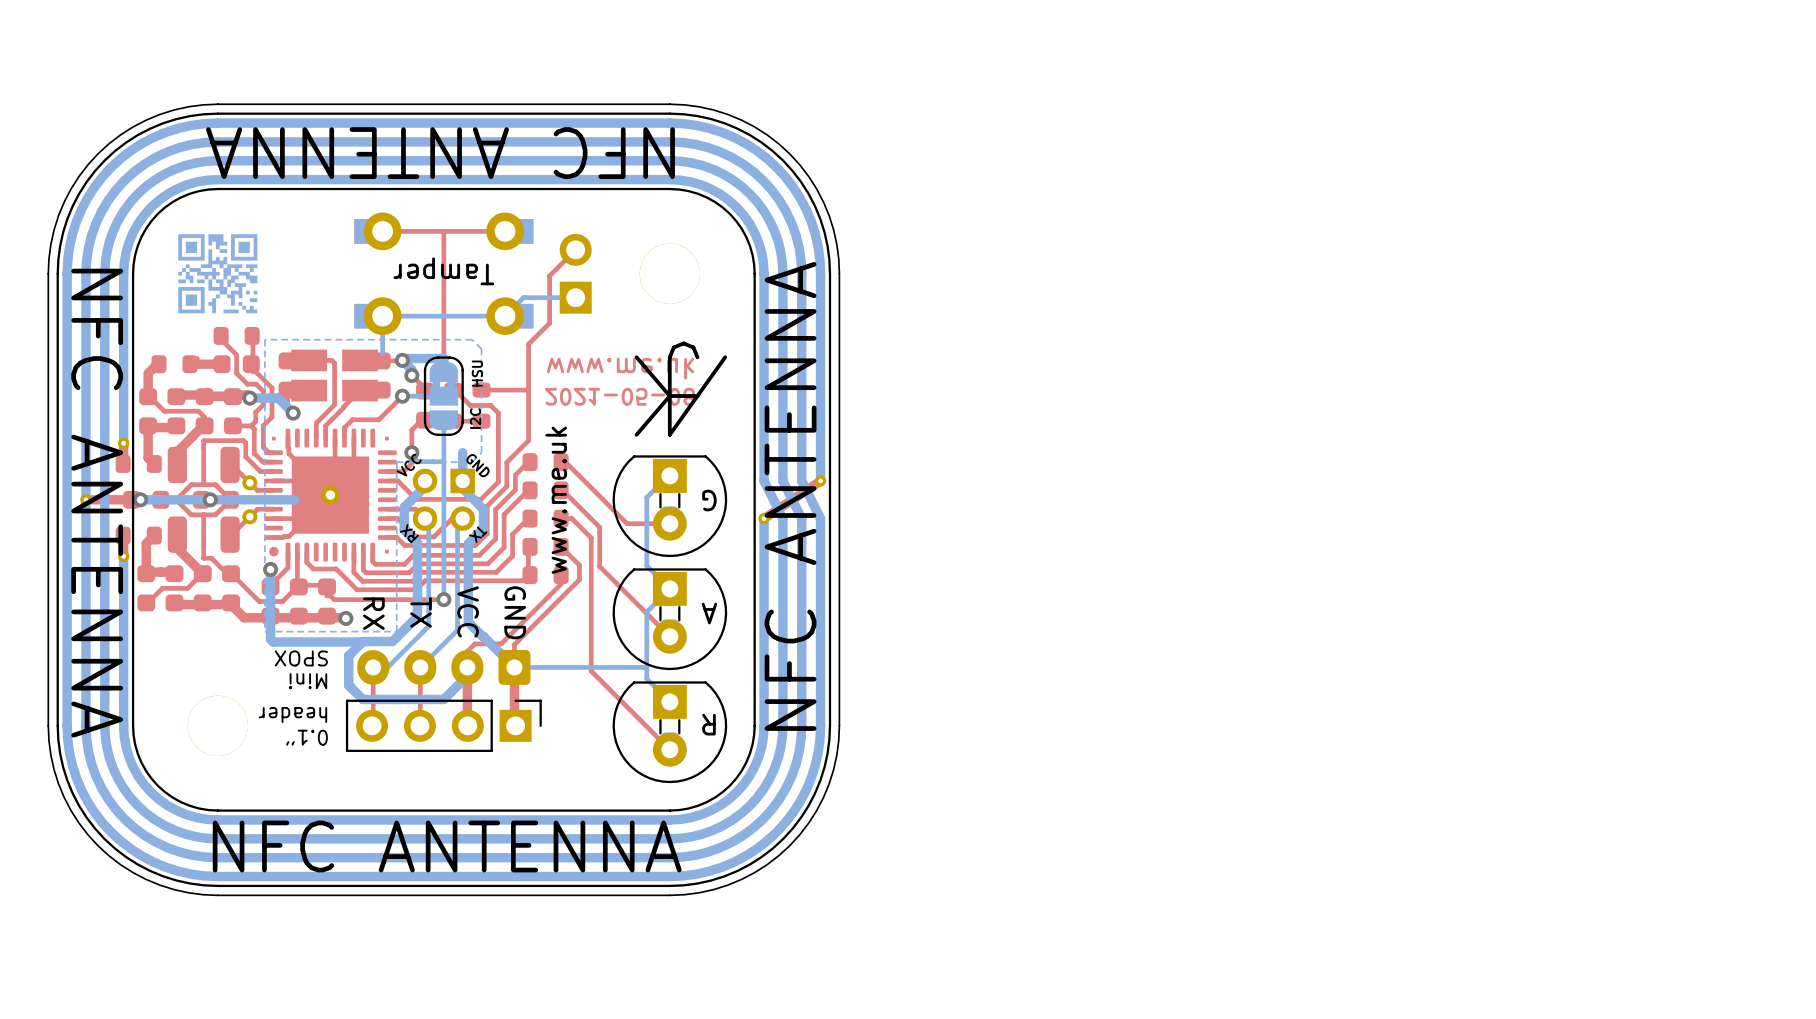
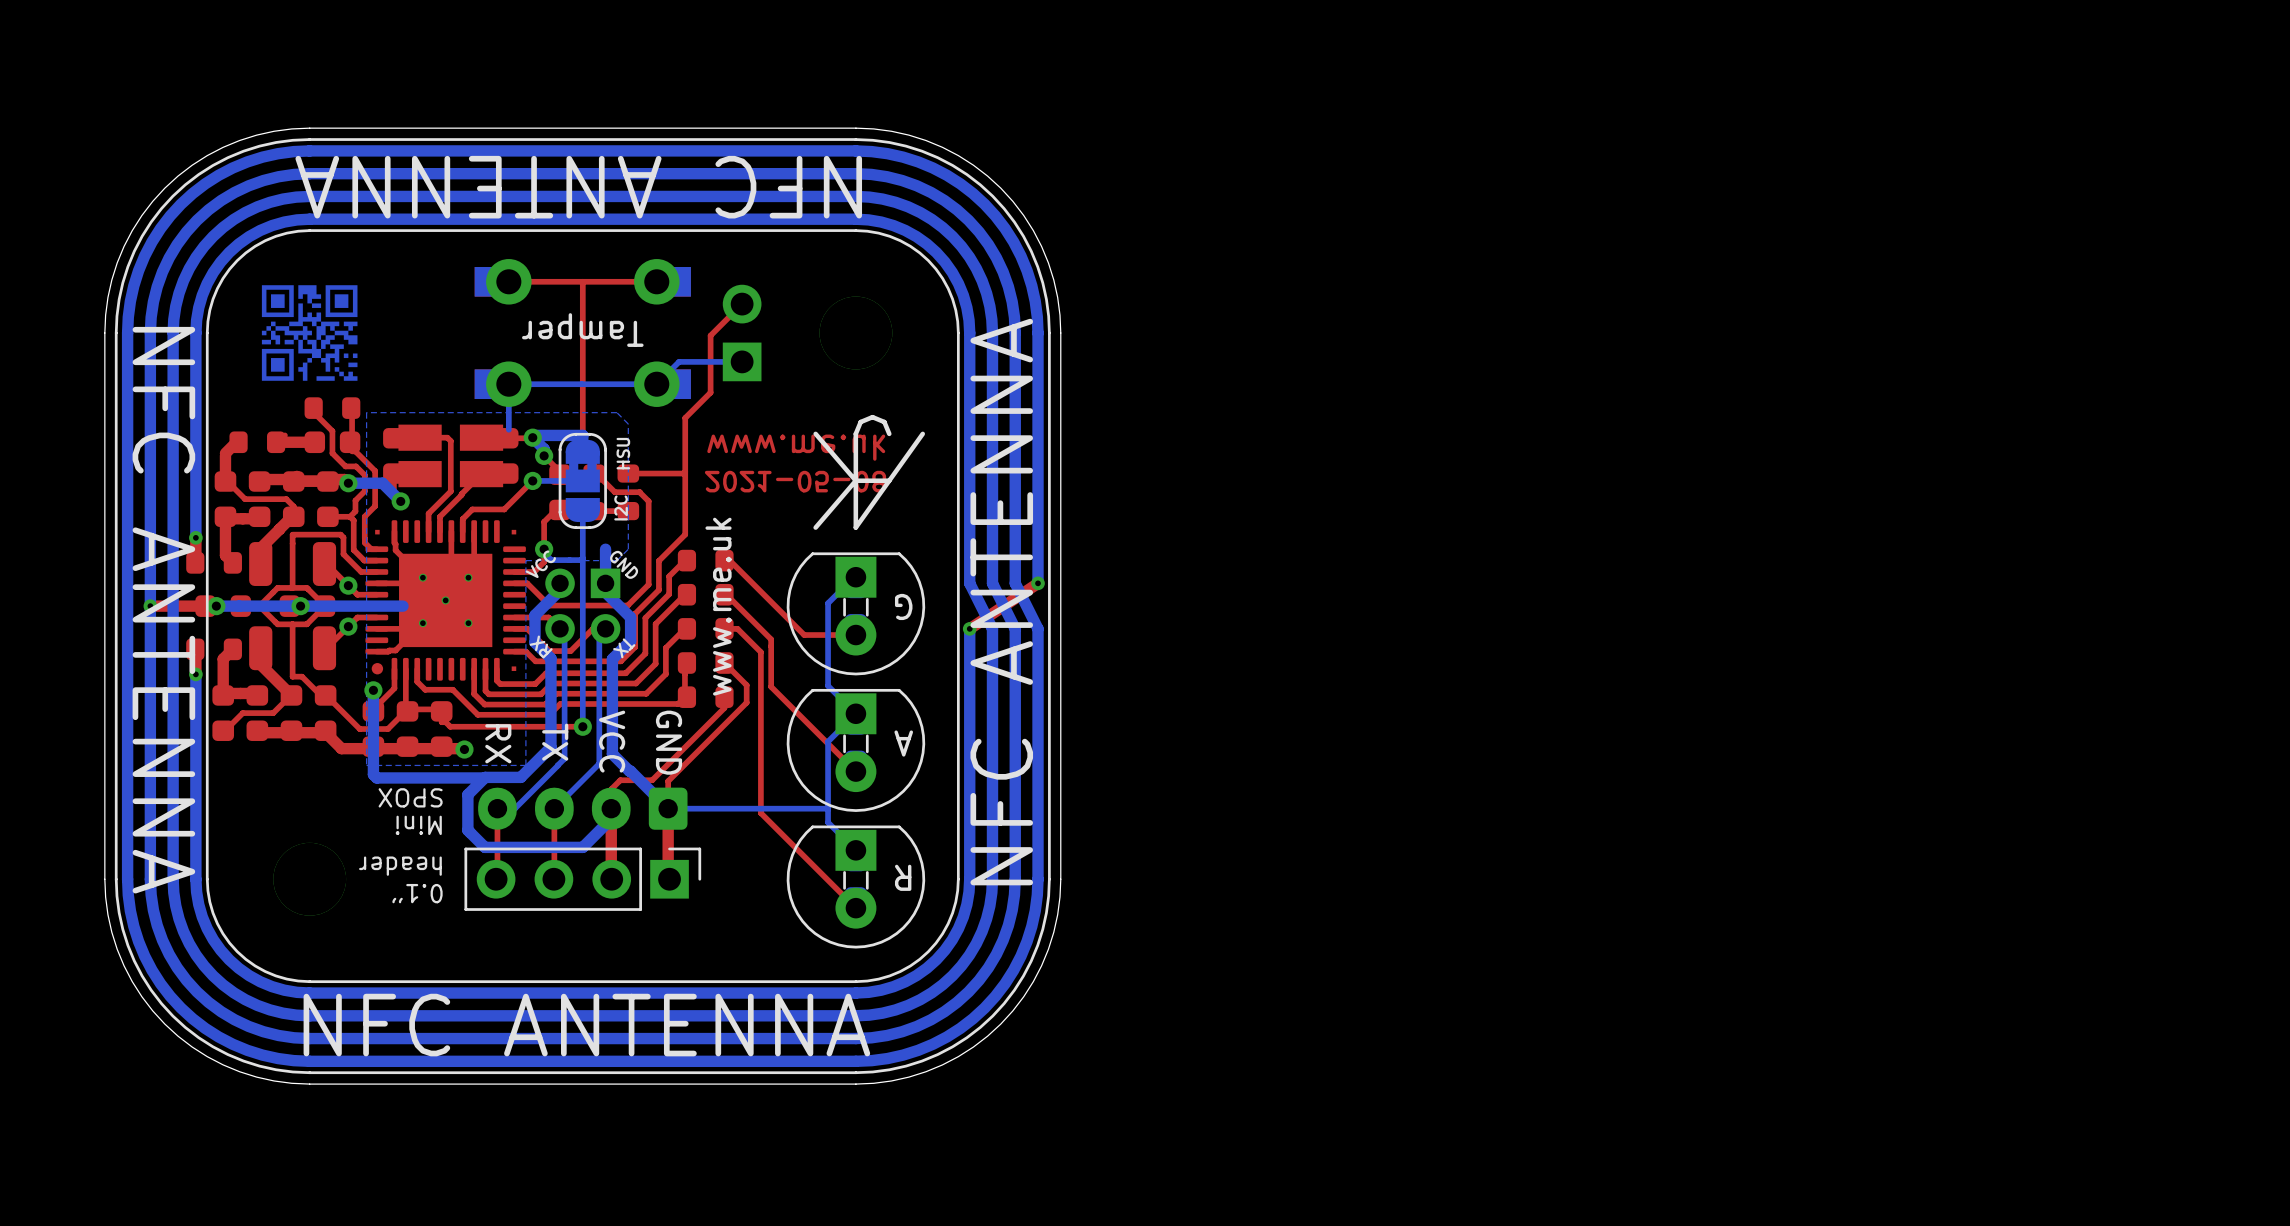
part footprint: [263, 428, 397, 562] -> [365, 520, 526, 681]

